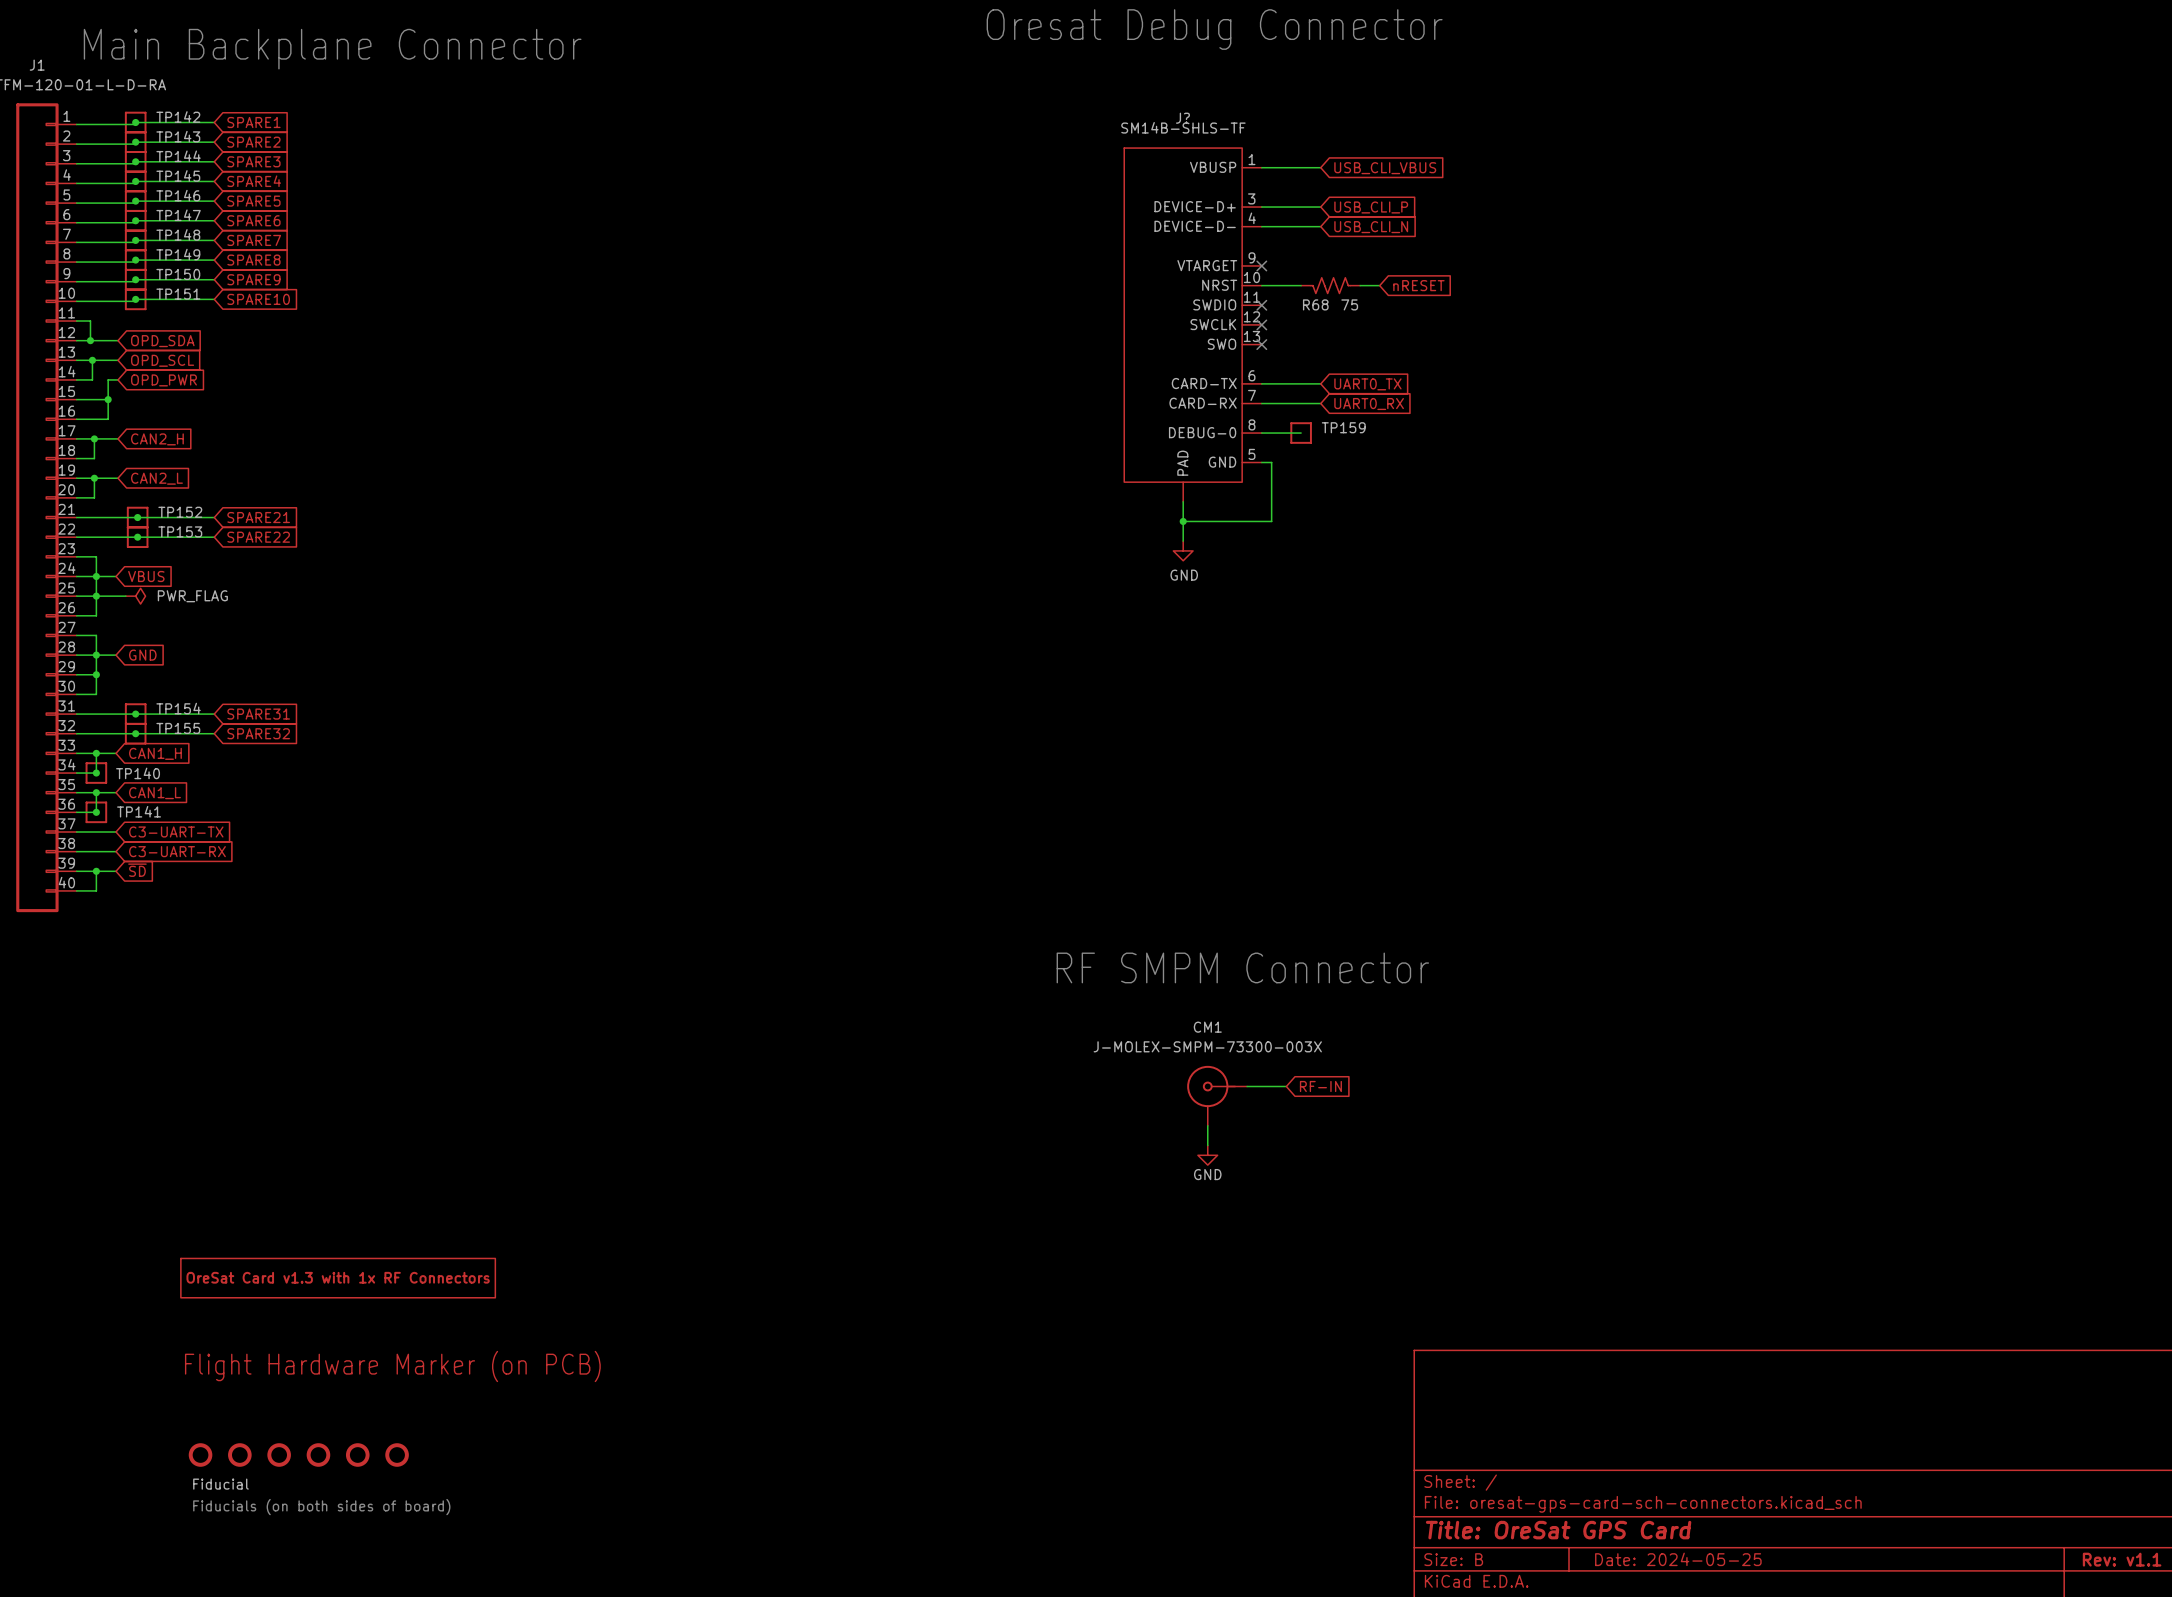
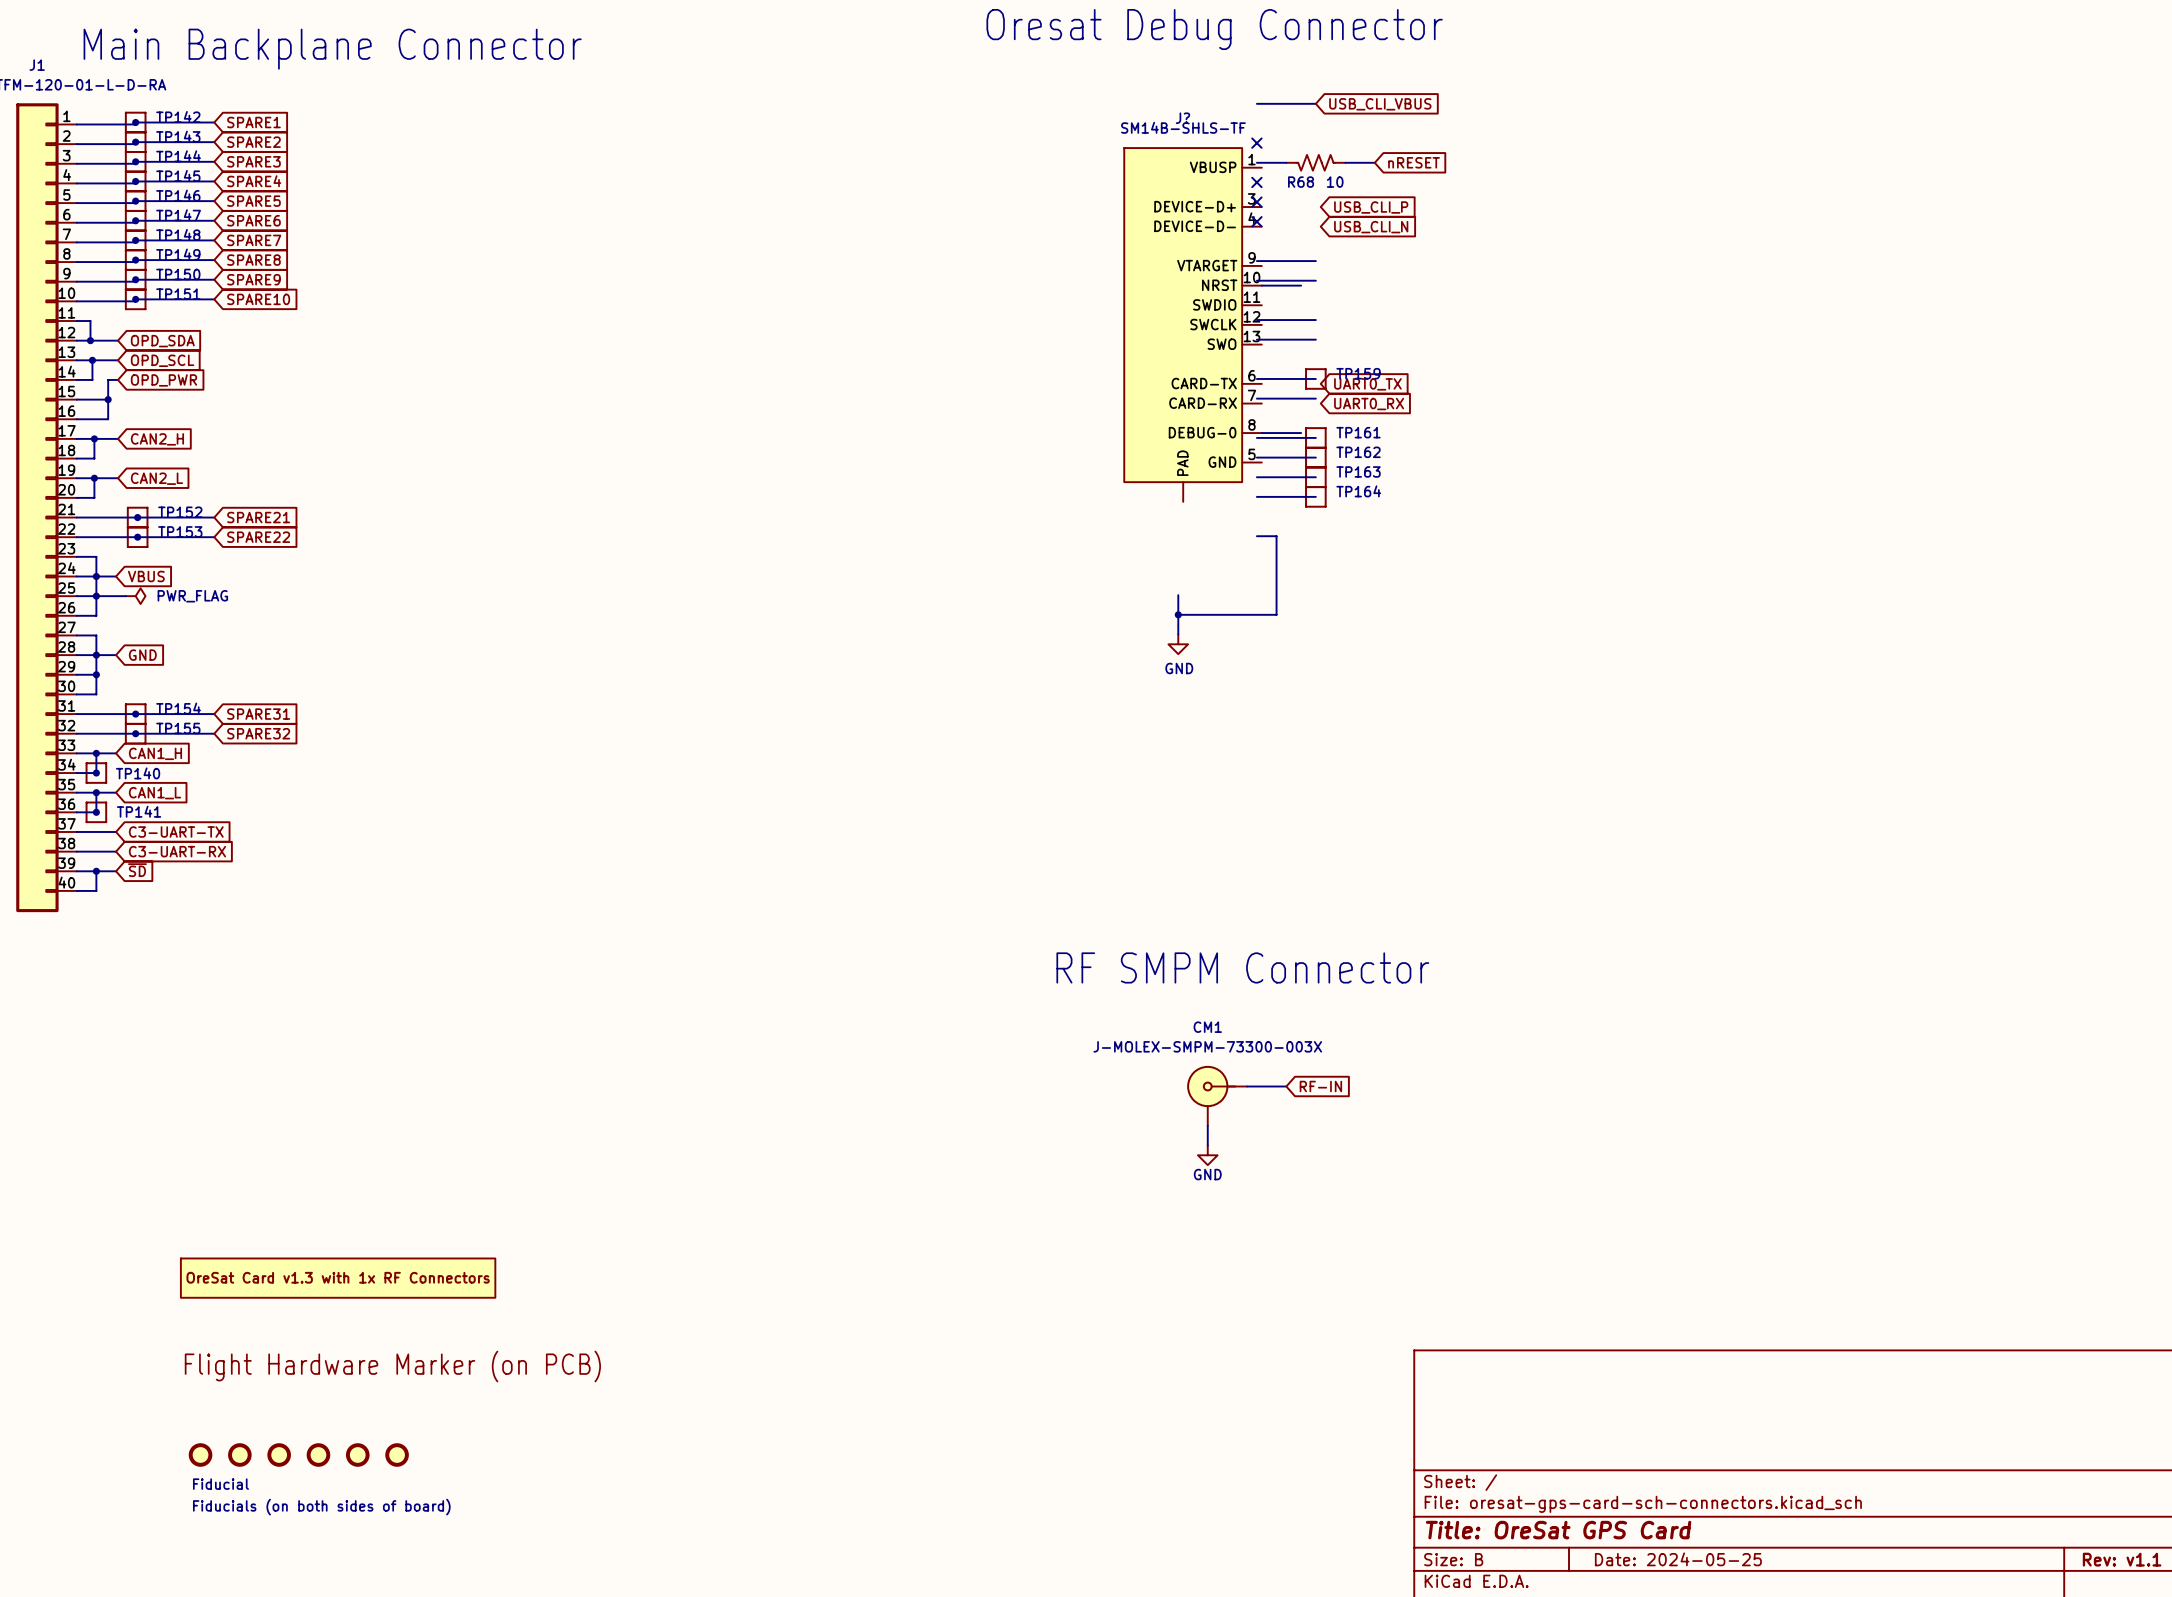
wire: none -> (1256, 103) (1315, 103)
no-connect mark: none -> (1256, 143)
wire: none -> (1256, 162) (1286, 162)
wire: none -> (1345, 162) (1374, 162)
wire: (1261, 167) (1320, 167) -> (1256, 261) (1315, 261)
global label position: USB_CLI_VBUS (1385, 168) -> USB_CLI_VBUS (1380, 104)
no-connect mark: none -> (1256, 182)
no-connect mark: none -> (1256, 202)
wire: (1261, 207) (1320, 207) -> (1256, 280) (1315, 280)
no-connect mark: none -> (1256, 221)
wire: (1261, 226) (1320, 226) -> (1256, 320) (1315, 320)
no-connect mark: (1261, 265) -> none
R68 position: (1330, 285) -> (1315, 162)
wire: (1360, 285) (1379, 285) -> none
global label position: nRESET (1418, 285) -> nRESET (1414, 162)
R68 value: 75 (1349, 304) -> 10 (1335, 182)
no-connect mark: (1261, 305) -> none
no-connect mark: (1261, 324) -> none
wire: none -> (1256, 339) (1315, 339)
no-connect mark: (1261, 344) -> none
wire: none -> (1256, 378) (1315, 378)
wire: (1261, 383) (1320, 383) -> (1256, 477) (1315, 477)
wire: none -> (1256, 398) (1315, 398)
wire: (1261, 403) (1320, 403) -> (1256, 496) (1315, 496)
TP159 position: (1301, 433) -> (1315, 378)
wire: none -> (1256, 437) (1315, 437)
TP161: none -> (1315, 437)
wire: none -> (1256, 457) (1315, 457)
TP162: none -> (1315, 457)
wire: (1261, 462) (1271, 462) (1271, 521) (1183, 521) -> none
TP163: none -> (1315, 477)
TP164: none -> (1315, 496)
wire: (1183, 501) (1183, 541) -> (1178, 595) (1178, 634)
junction: (1183, 521) -> none
wire: none -> (1256, 536) (1276, 536) (1276, 614) (1178, 614)
power symbol position: GND (1183, 550) -> GND (1178, 644)
junction: none -> (1178, 614)

